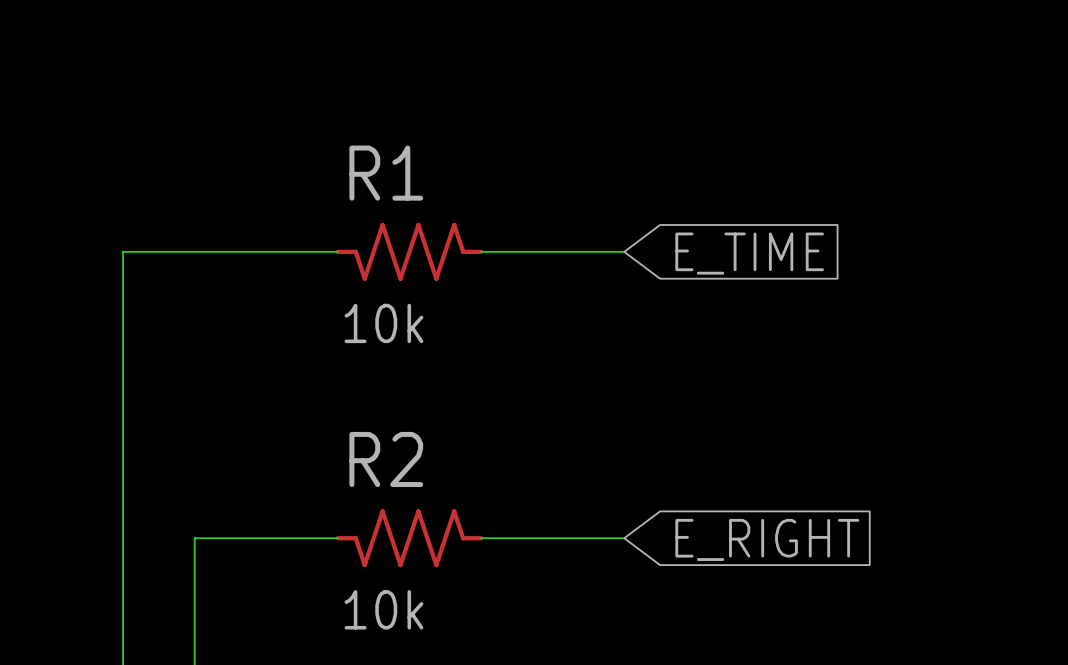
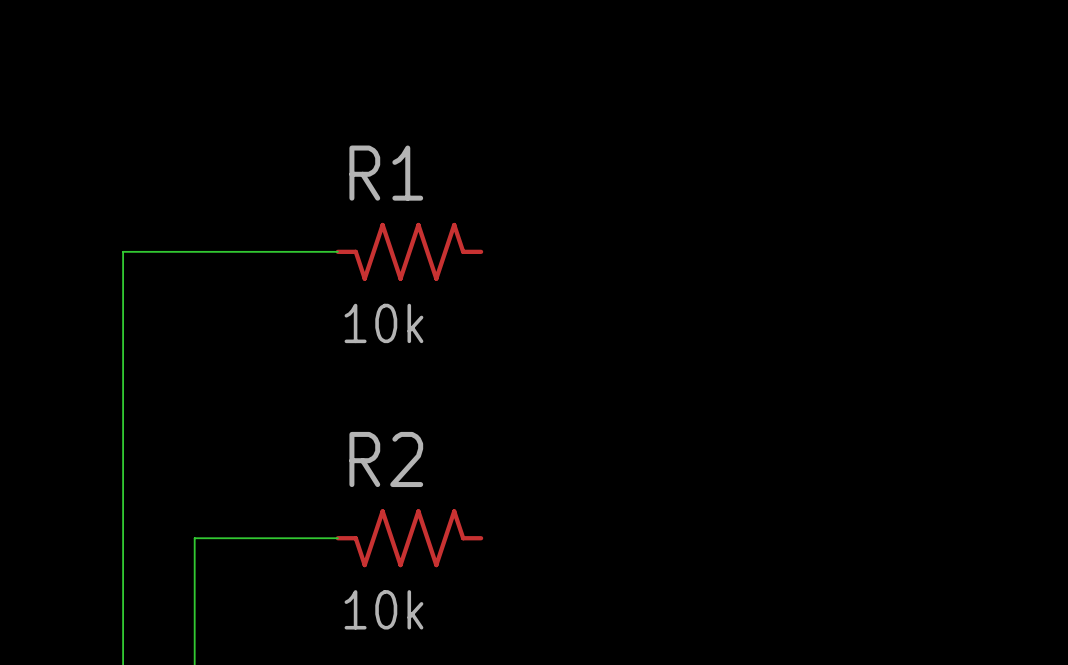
wire: (481, 251) (624, 251) -> none
global label: E_TIME (749, 253) -> none
wire: (481, 538) (624, 538) -> none
global label: E_RIGHT (767, 539) -> none

